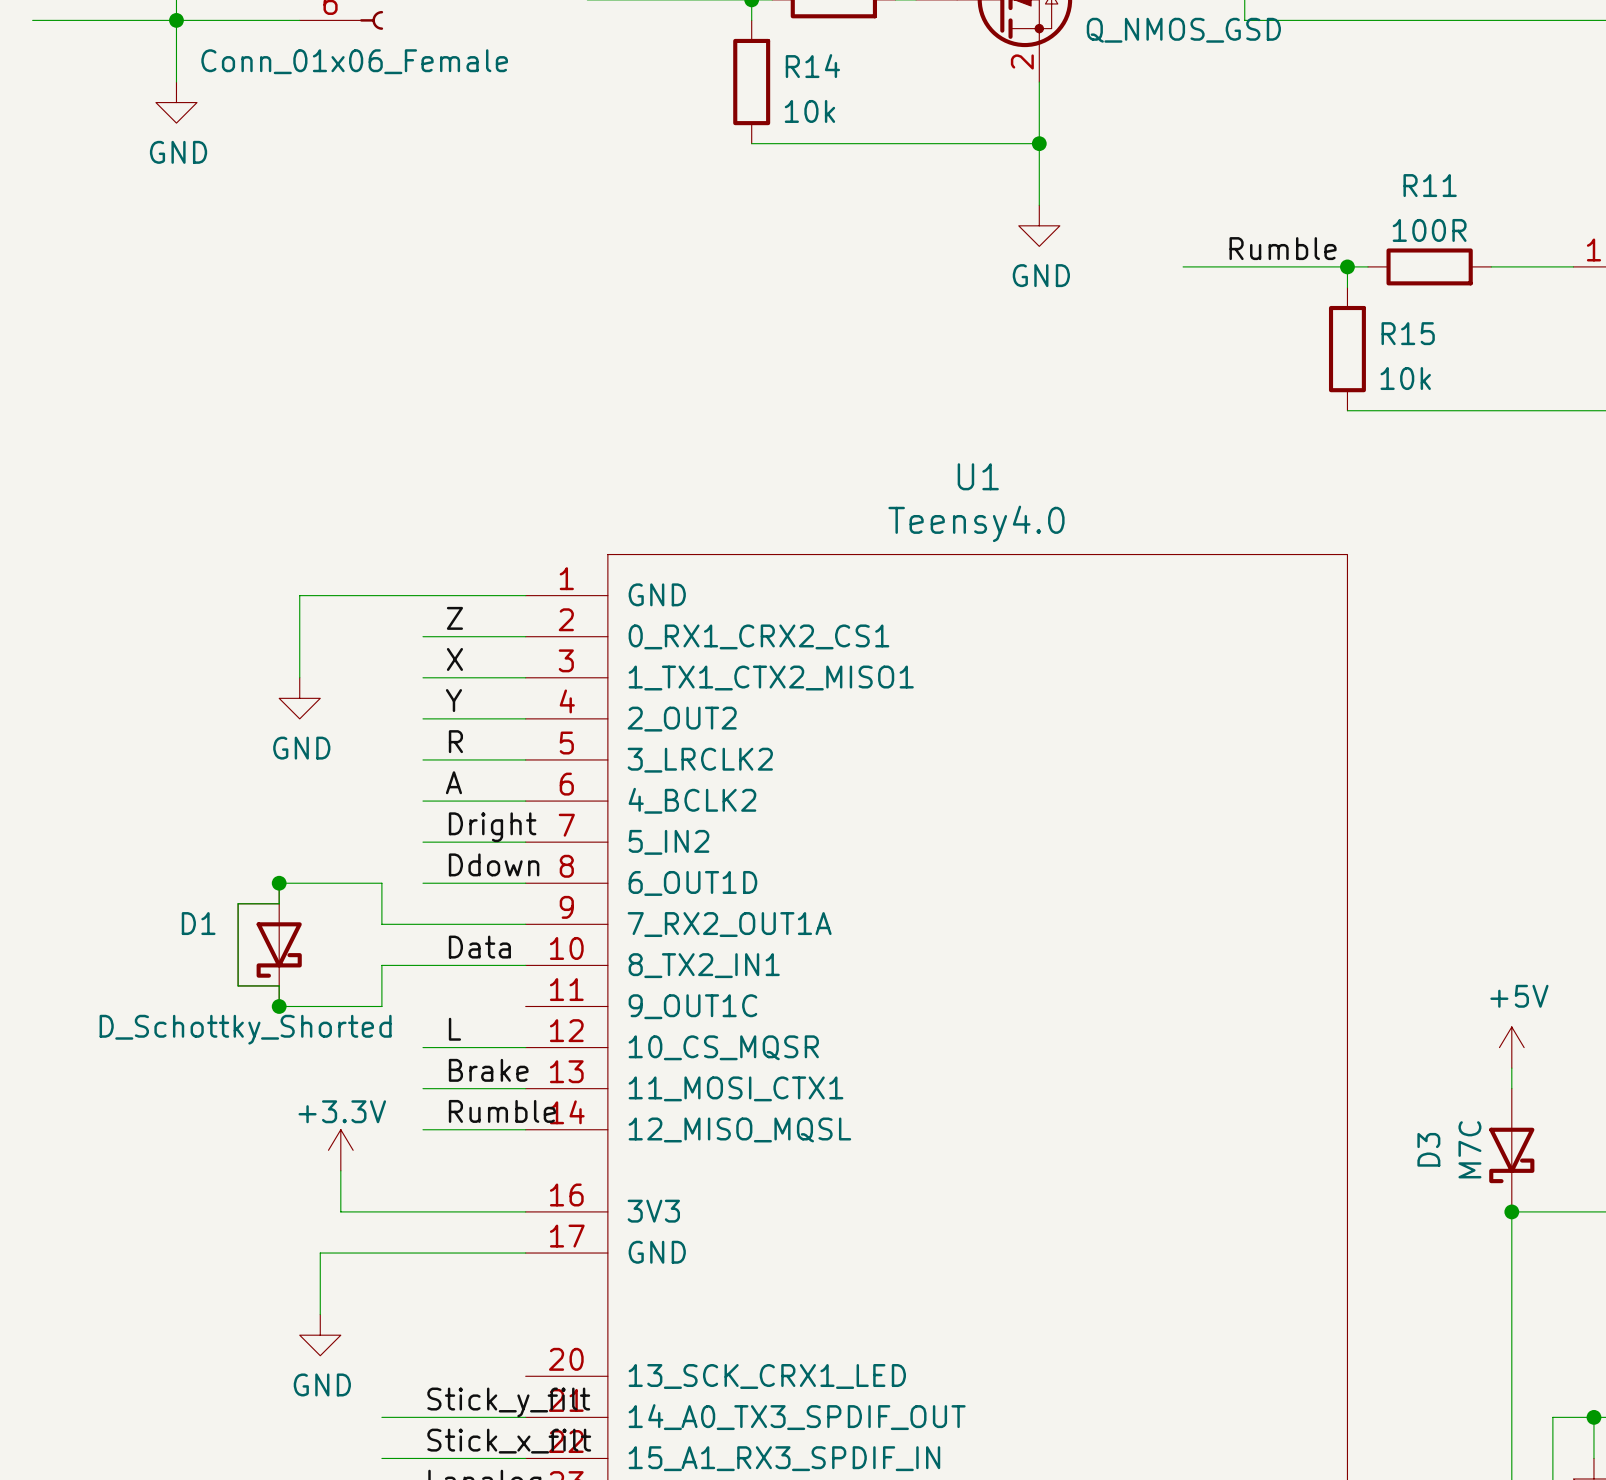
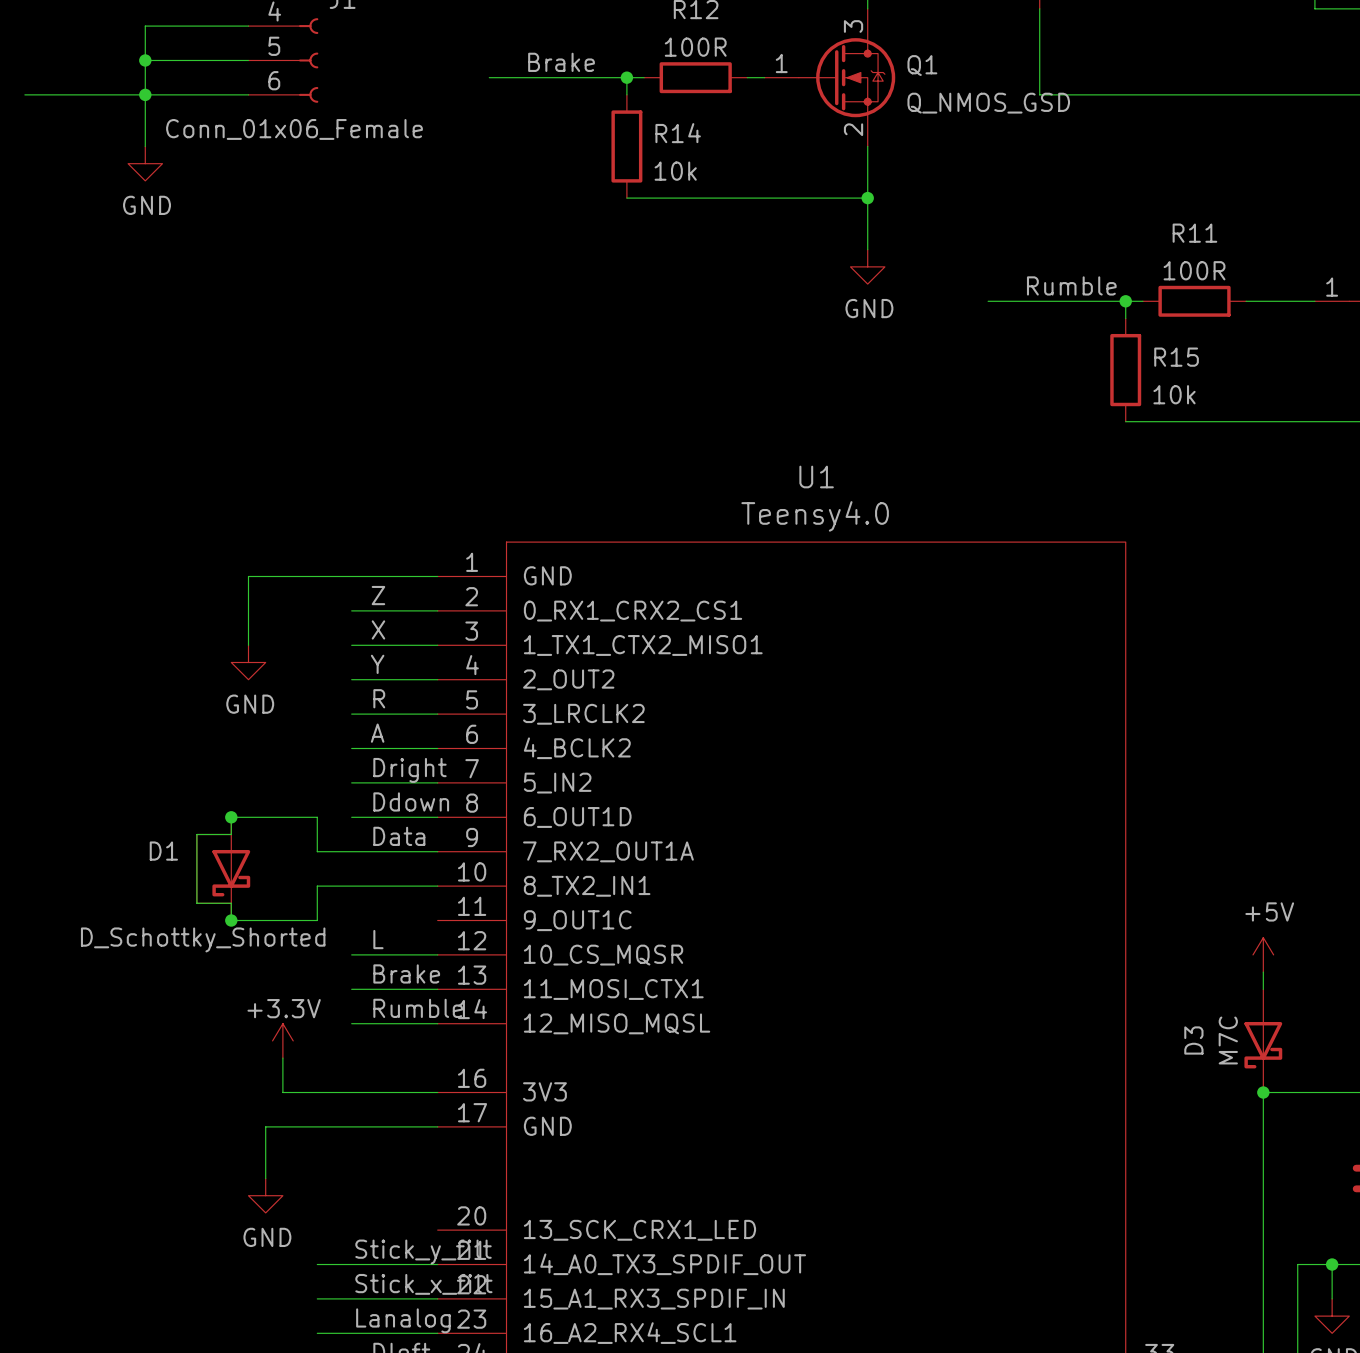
label position: Data (479, 947) -> Data (399, 836)

